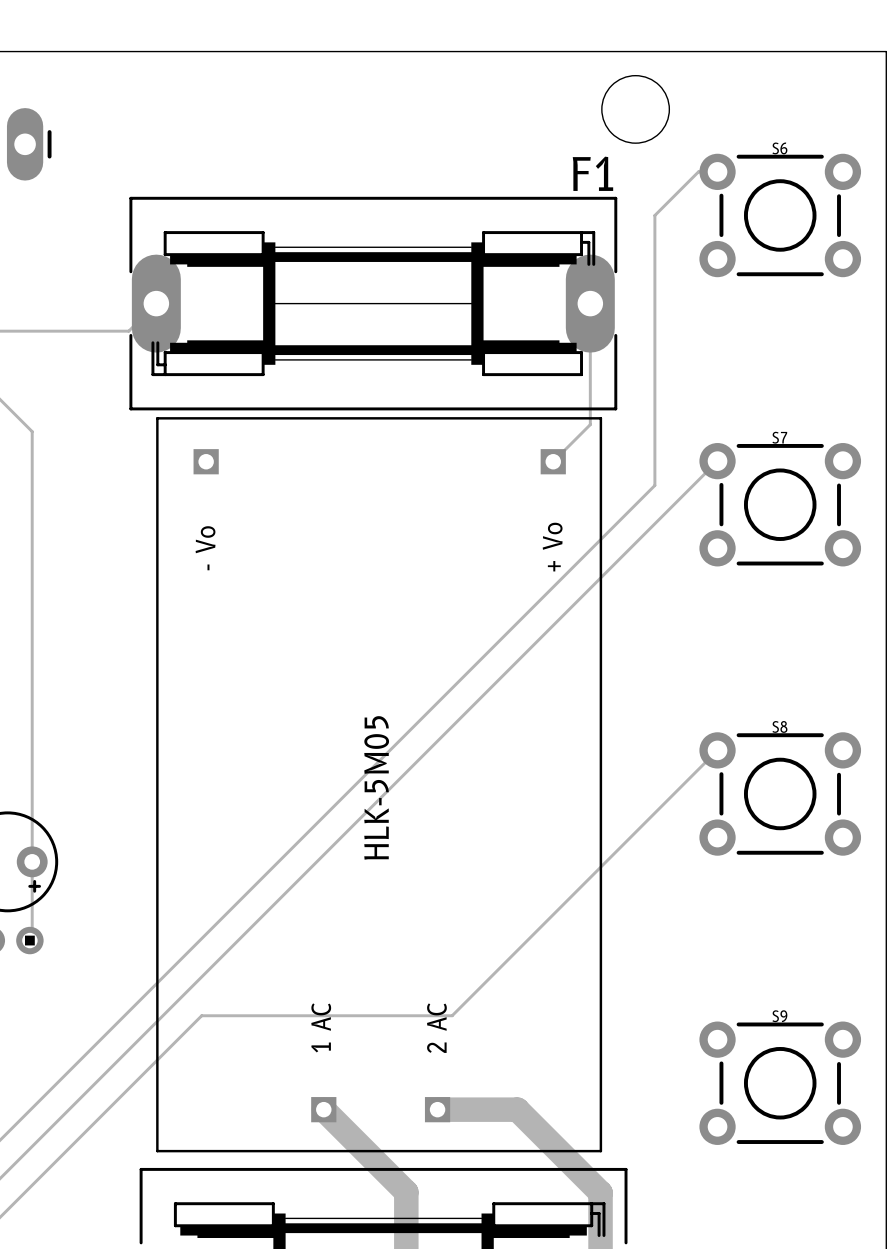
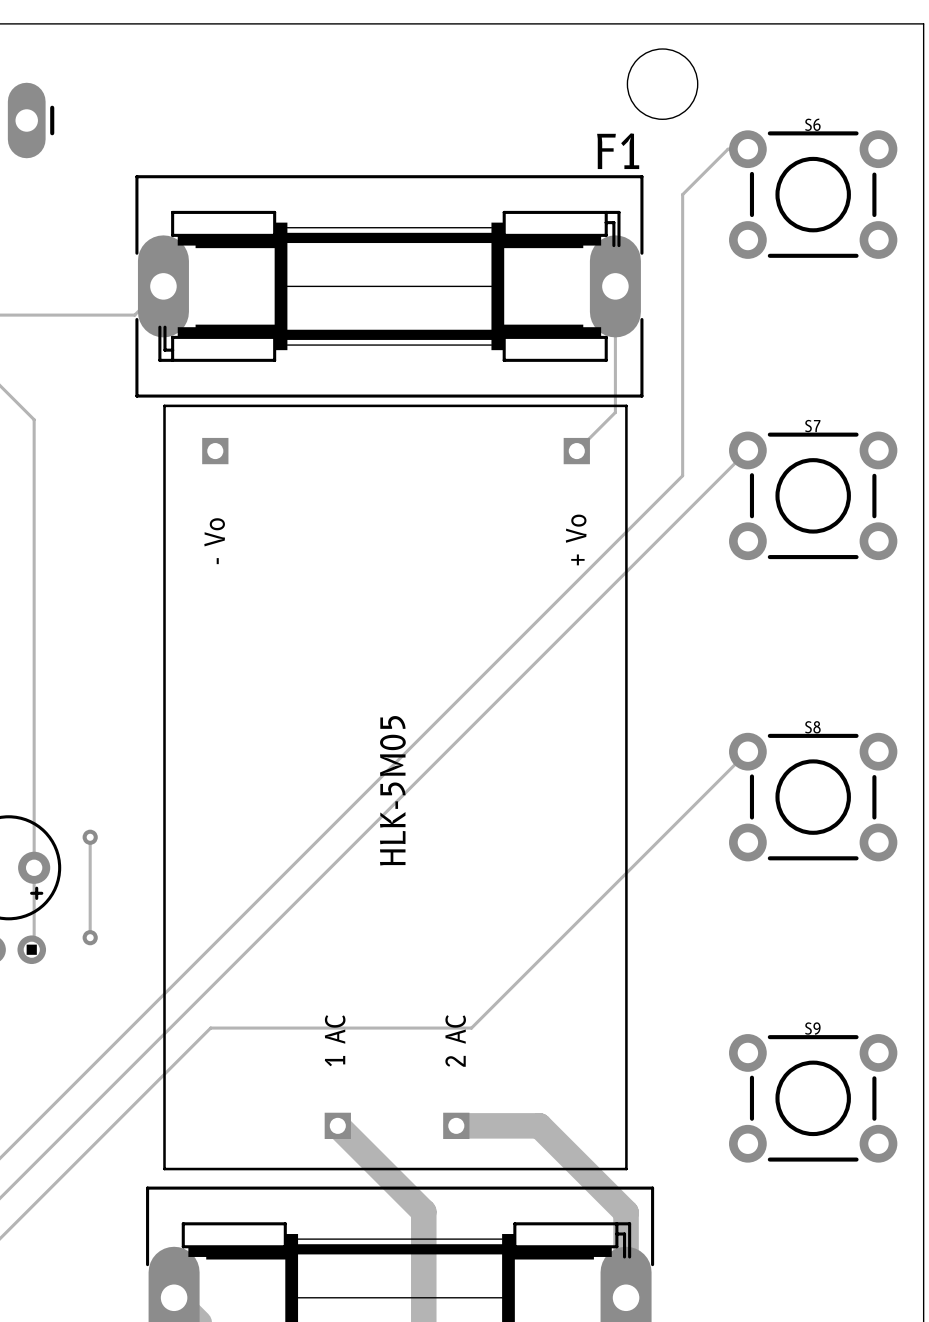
track: none -> (90, 837) (90, 937)
via: none -> (90, 837)
via: none -> (90, 937)

